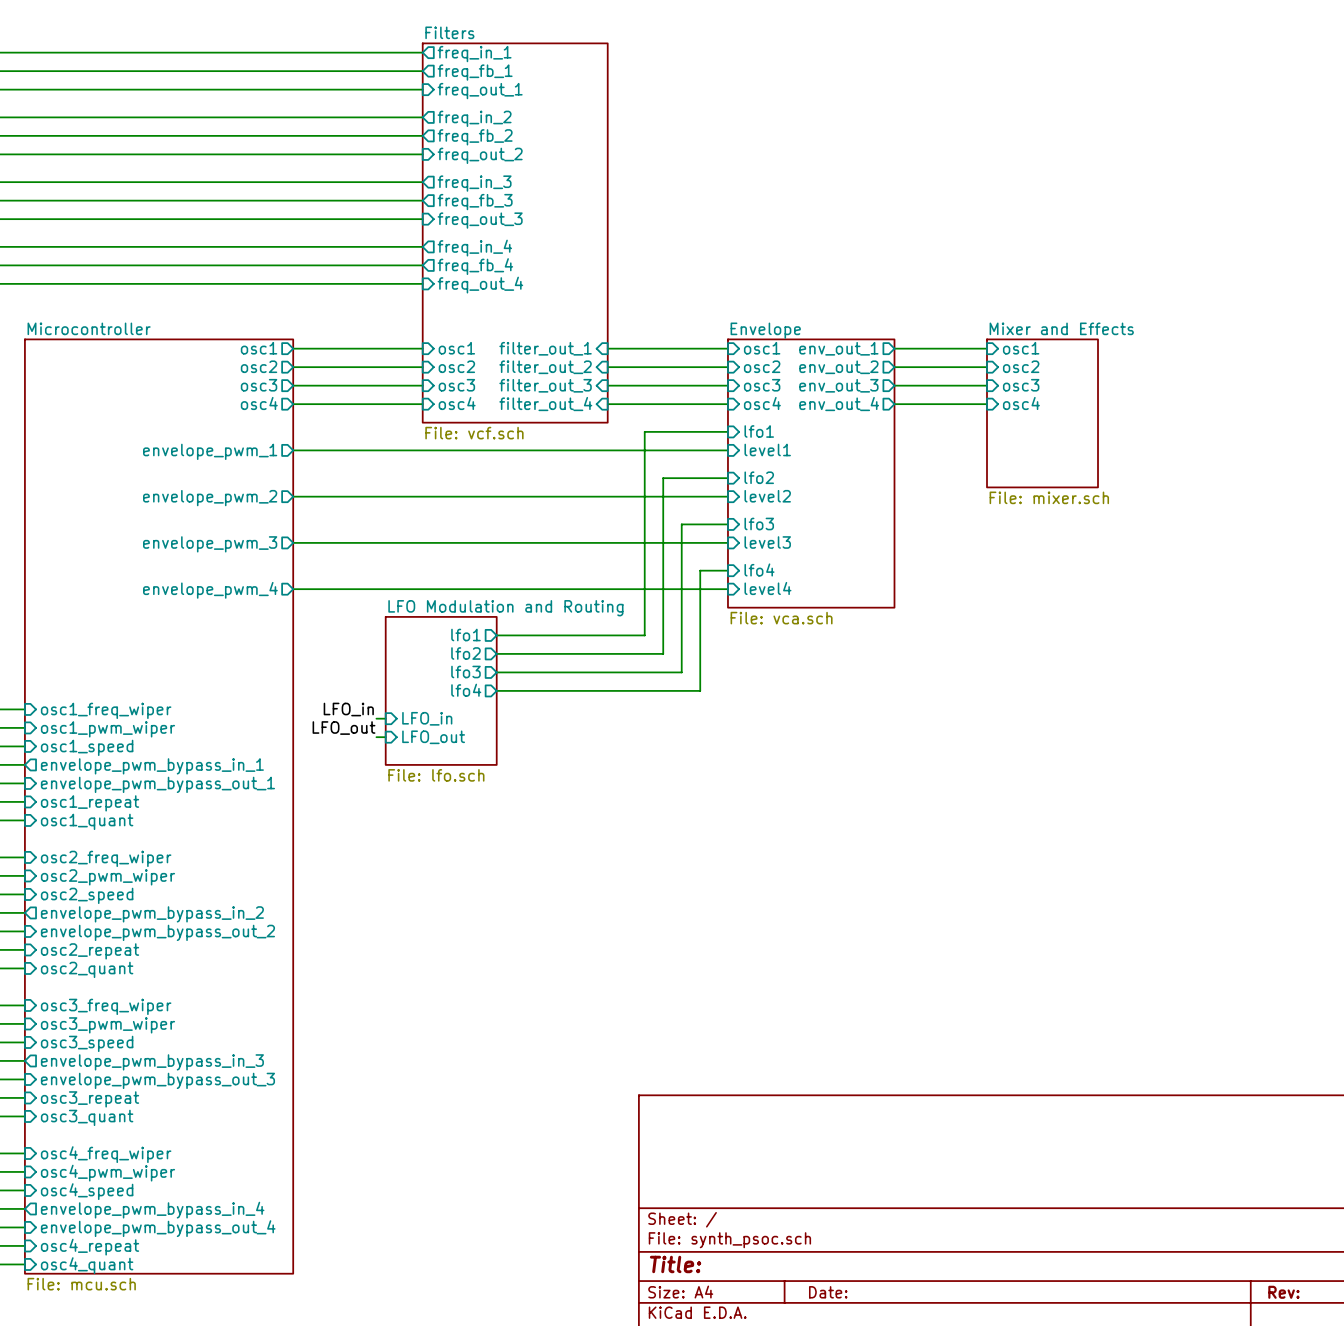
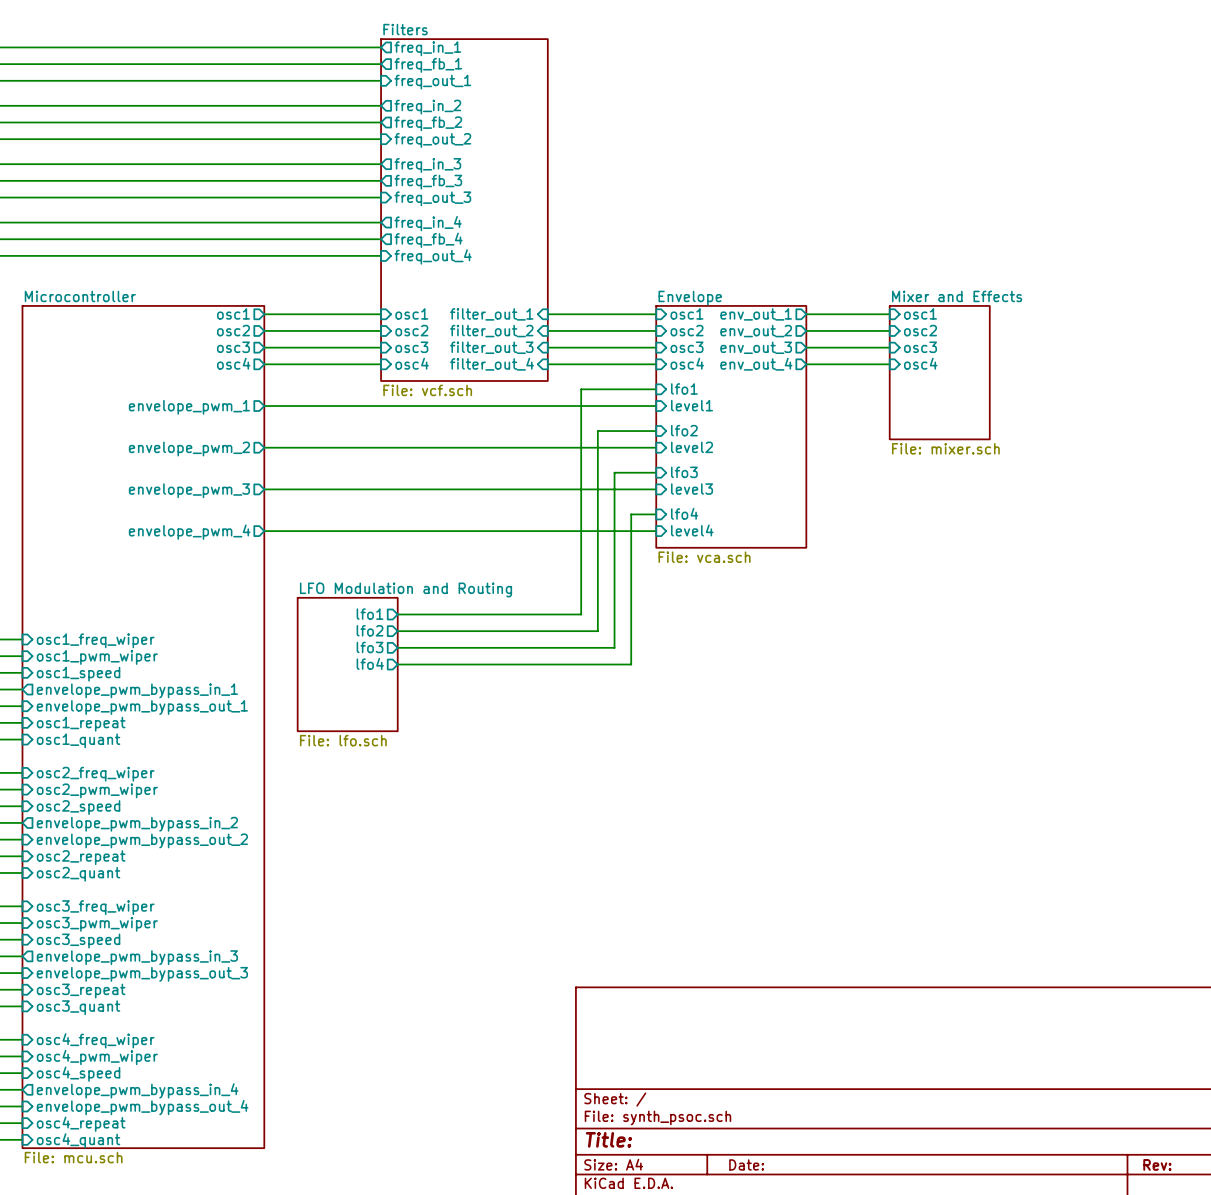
sheet pin position: lfo1 (465, 635) -> lfo1 (370, 614)
wire: (496, 635) (644, 635) -> (397, 614) (581, 614) (581, 572)
sheet pin position: lfo2 (465, 653) -> lfo2 (370, 630)
wire: (496, 653) (663, 653) -> (397, 631) (597, 631) (597, 589)
sheet pin position: lfo3 (465, 672) -> lfo3 (370, 647)
wire: (496, 672) (681, 672) -> (397, 647) (614, 647) (614, 606)
sheet LFO Modulation and Routing position: (441, 690) -> (347, 664)
sheet pin position: lfo4 (466, 690) -> lfo4 (370, 663)
wire: (496, 690) (700, 690) -> (397, 664) (631, 664) (631, 622)
label: LFO_in (348, 709) -> none
wire: (376, 718) (385, 718) -> none
sheet pin: LFO_in (427, 718) -> none
label: LFO_out (344, 728) -> none
wire: (376, 737) (385, 737) -> none
sheet pin: LFO_out (433, 737) -> none

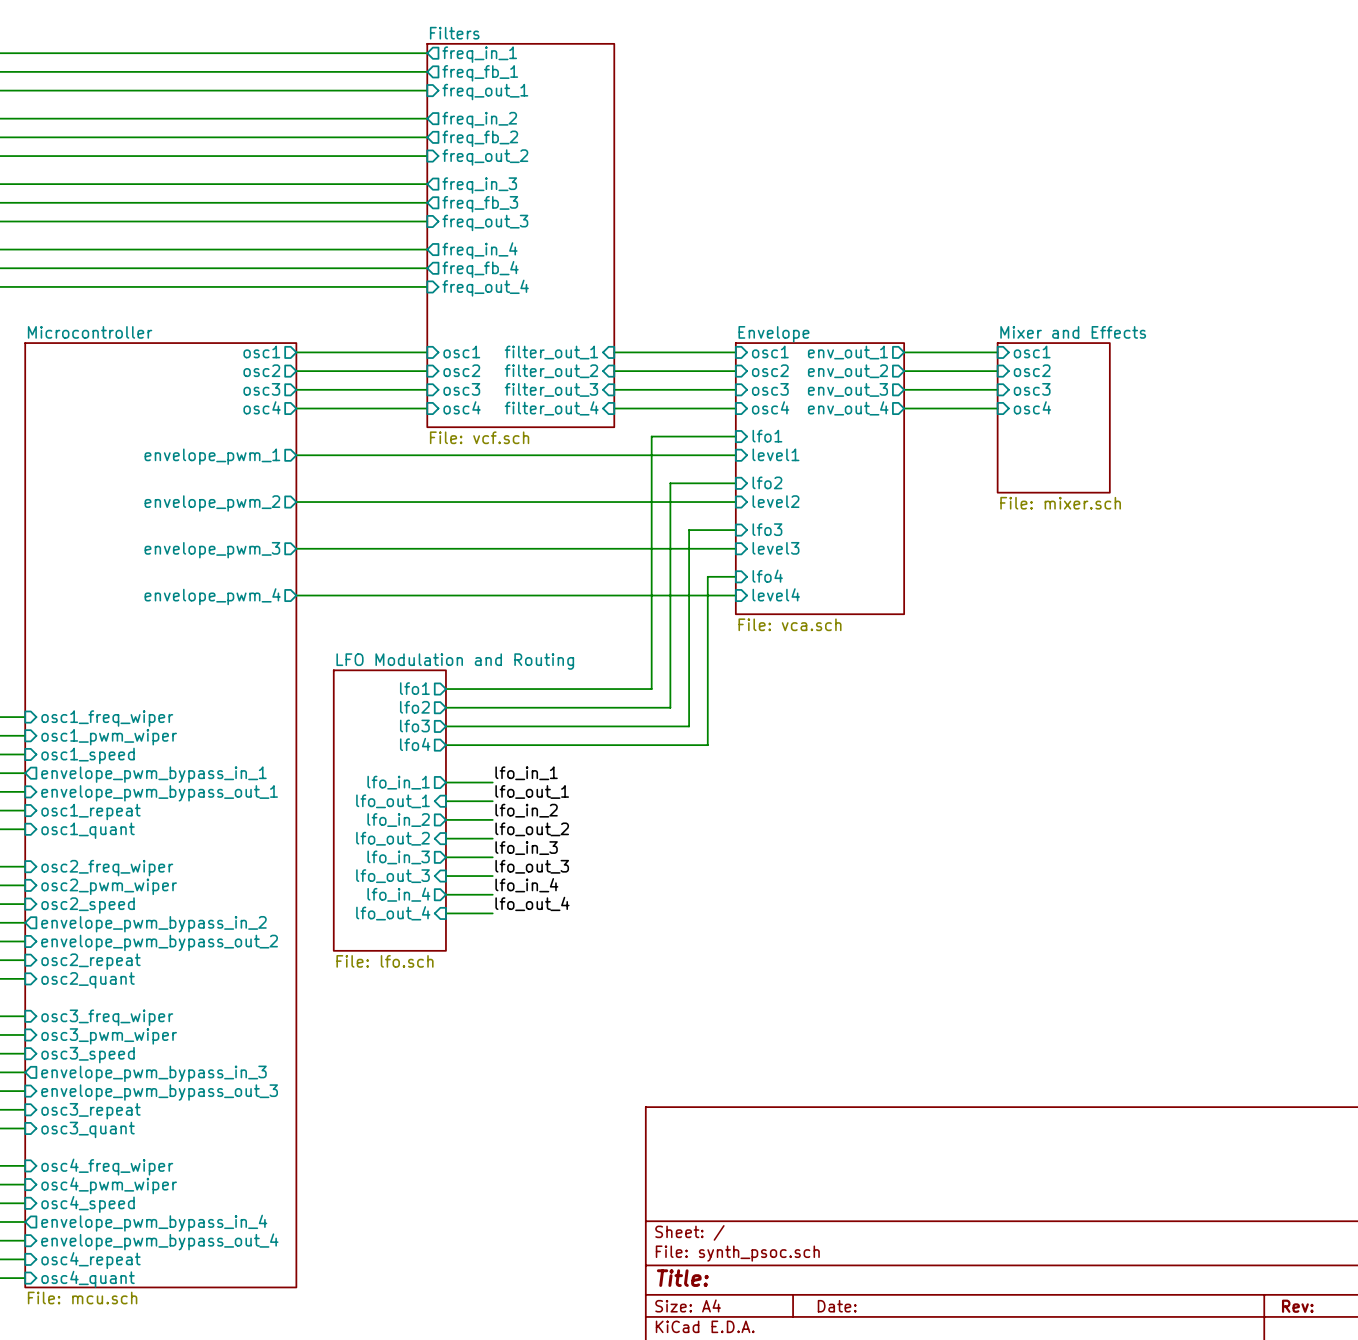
sheet LFO Modulation and Routing: File: lfo.sch (347, 664) -> none
label: none -> lfo_in_1 (526, 773)
sheet pin: none -> lfo_in_1 (398, 782)
wire: none -> (445, 782) (492, 782)
label: none -> lfo_out_1 (532, 791)
sheet pin: none -> lfo_out_1 (393, 801)
wire: none -> (445, 801) (492, 801)
sheet LFO Modulation and Routing: none -> File: lfo.sch (389, 810)
label: none -> lfo_in_2 (526, 810)
sheet pin: none -> lfo_in_2 (398, 820)
wire: none -> (445, 819) (492, 819)
label: none -> lfo_out_2 (532, 829)
wire: none -> (445, 838) (492, 838)
sheet pin: none -> lfo_out_2 (393, 838)
label: none -> lfo_in_3 (526, 848)
sheet pin: none -> lfo_in_3 (398, 857)
wire: none -> (445, 857) (492, 857)
label: none -> lfo_out_3 (532, 866)
sheet pin: none -> lfo_out_3 (393, 876)
wire: none -> (445, 876) (492, 876)
label: none -> lfo_in_4 (526, 885)
sheet pin: none -> lfo_in_4 (398, 894)
wire: none -> (445, 894) (492, 894)
label: none -> lfo_out_4 (532, 903)
sheet pin: none -> lfo_out_4 (393, 913)
wire: none -> (445, 913) (492, 913)

